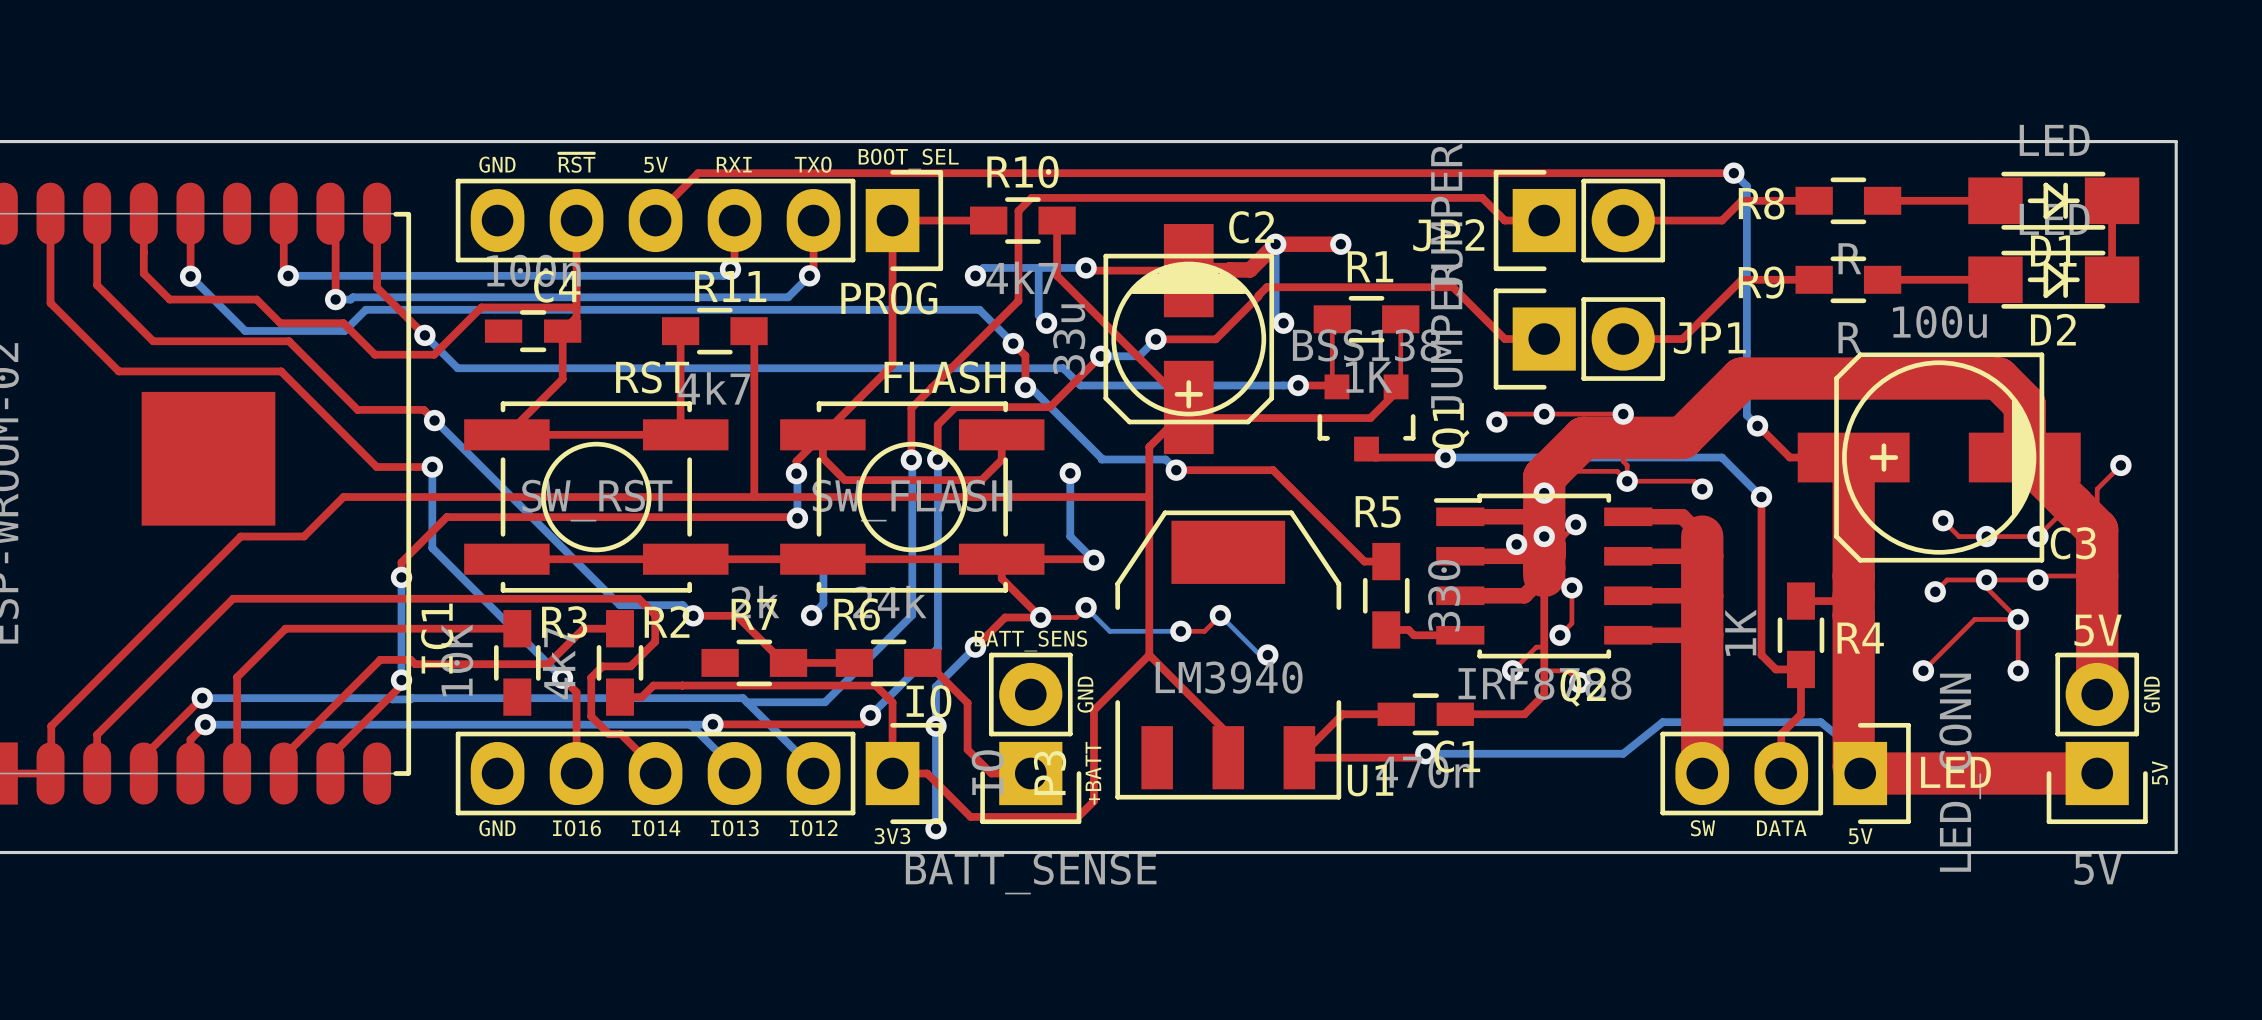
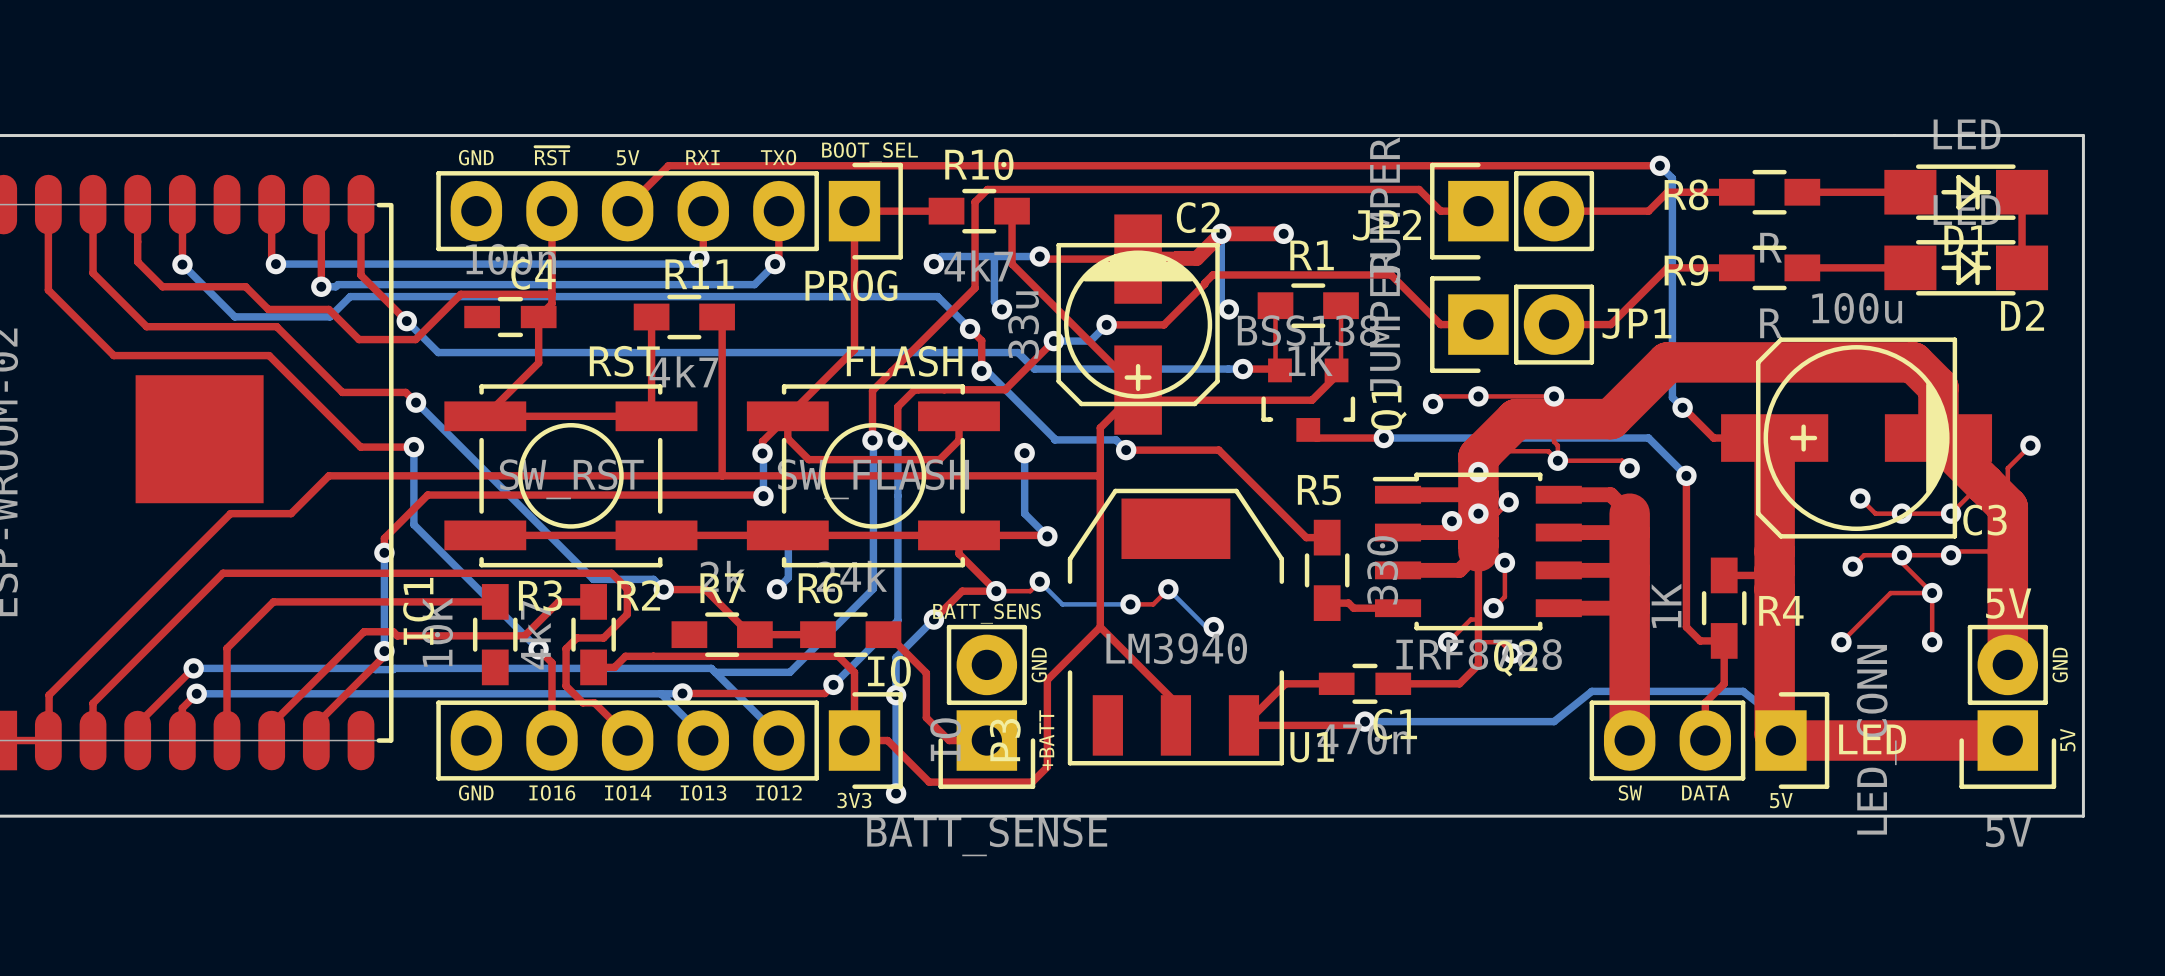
D2 name position: D2 (2053, 329) -> D2 (2022, 315)

